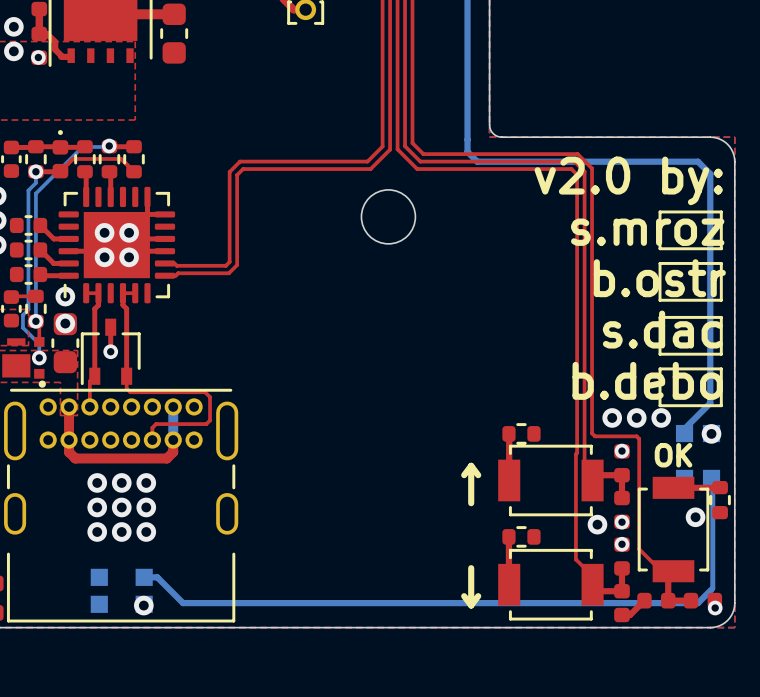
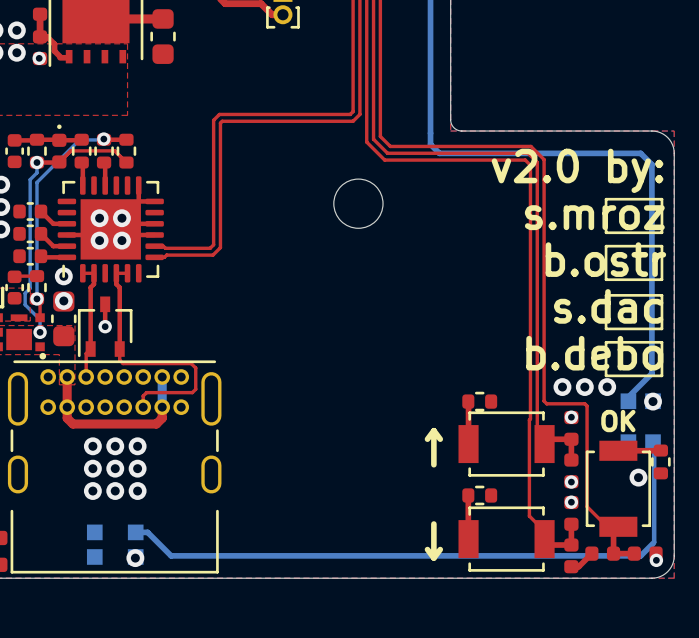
top track: (382, 115) (382, 146) (367, 161) (240, 161) (229, 171) -> (353, 111) (350, 114) (219, 114) (213, 120) (213, 162)
top track: (390, 118) (390, 149) (370, 169) (243, 169) (237, 175) -> (359, 114) (353, 121) (222, 121) (220, 123) (220, 165)
via: (597, 524) -> none

